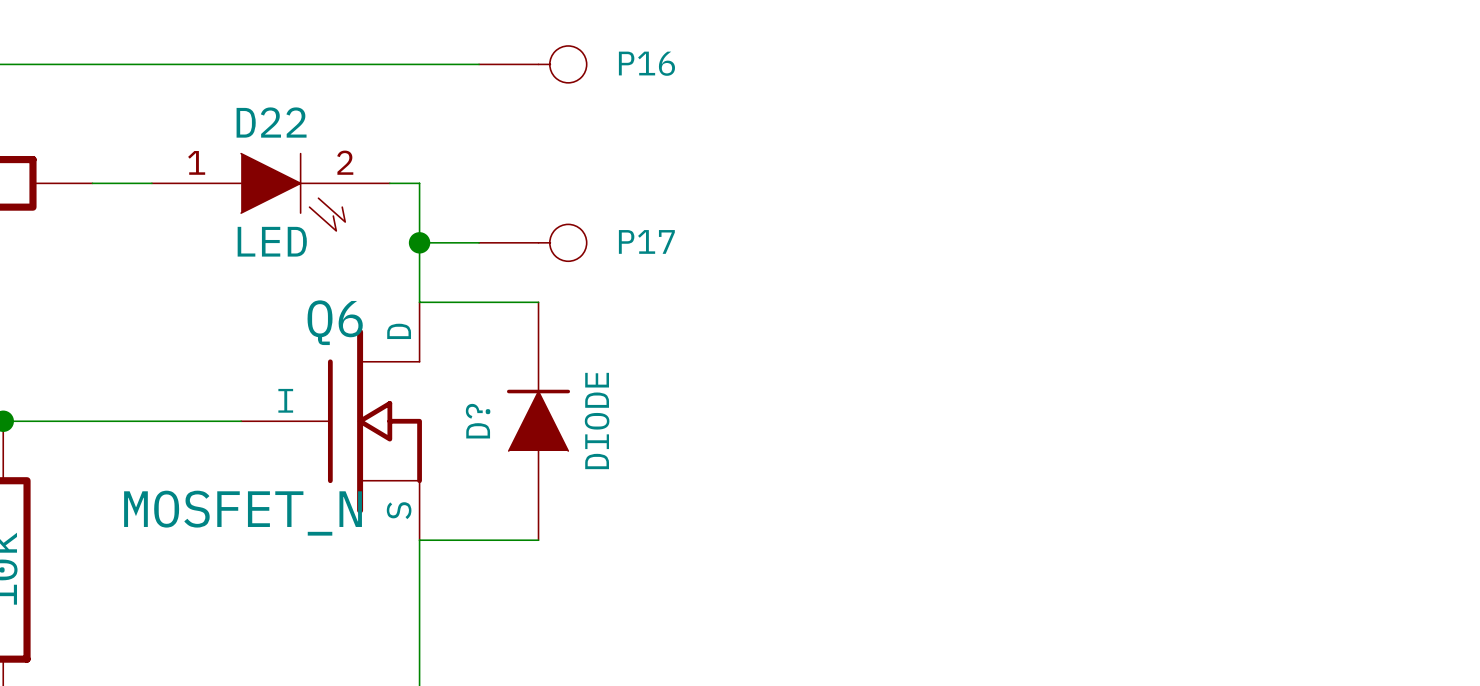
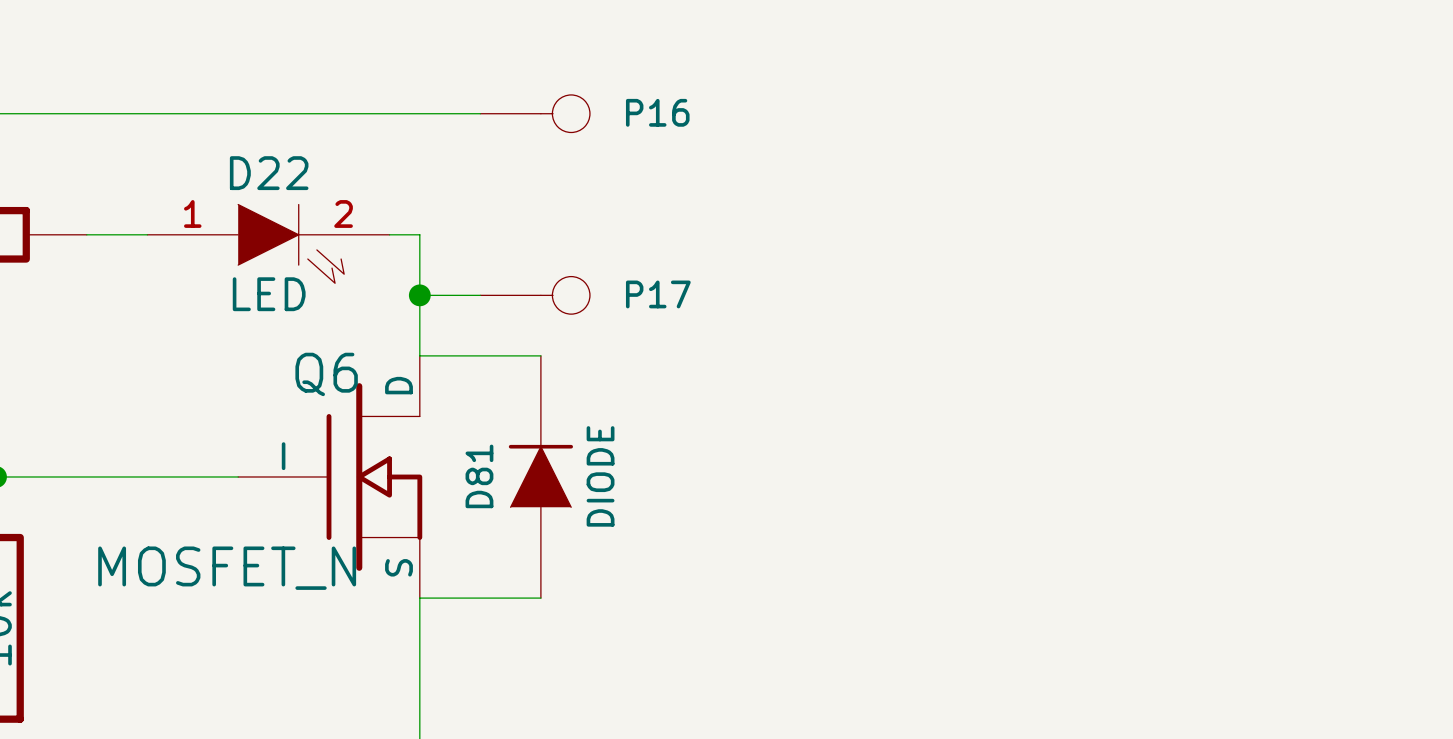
D? name: D? (478, 421) -> D81 (479, 476)

